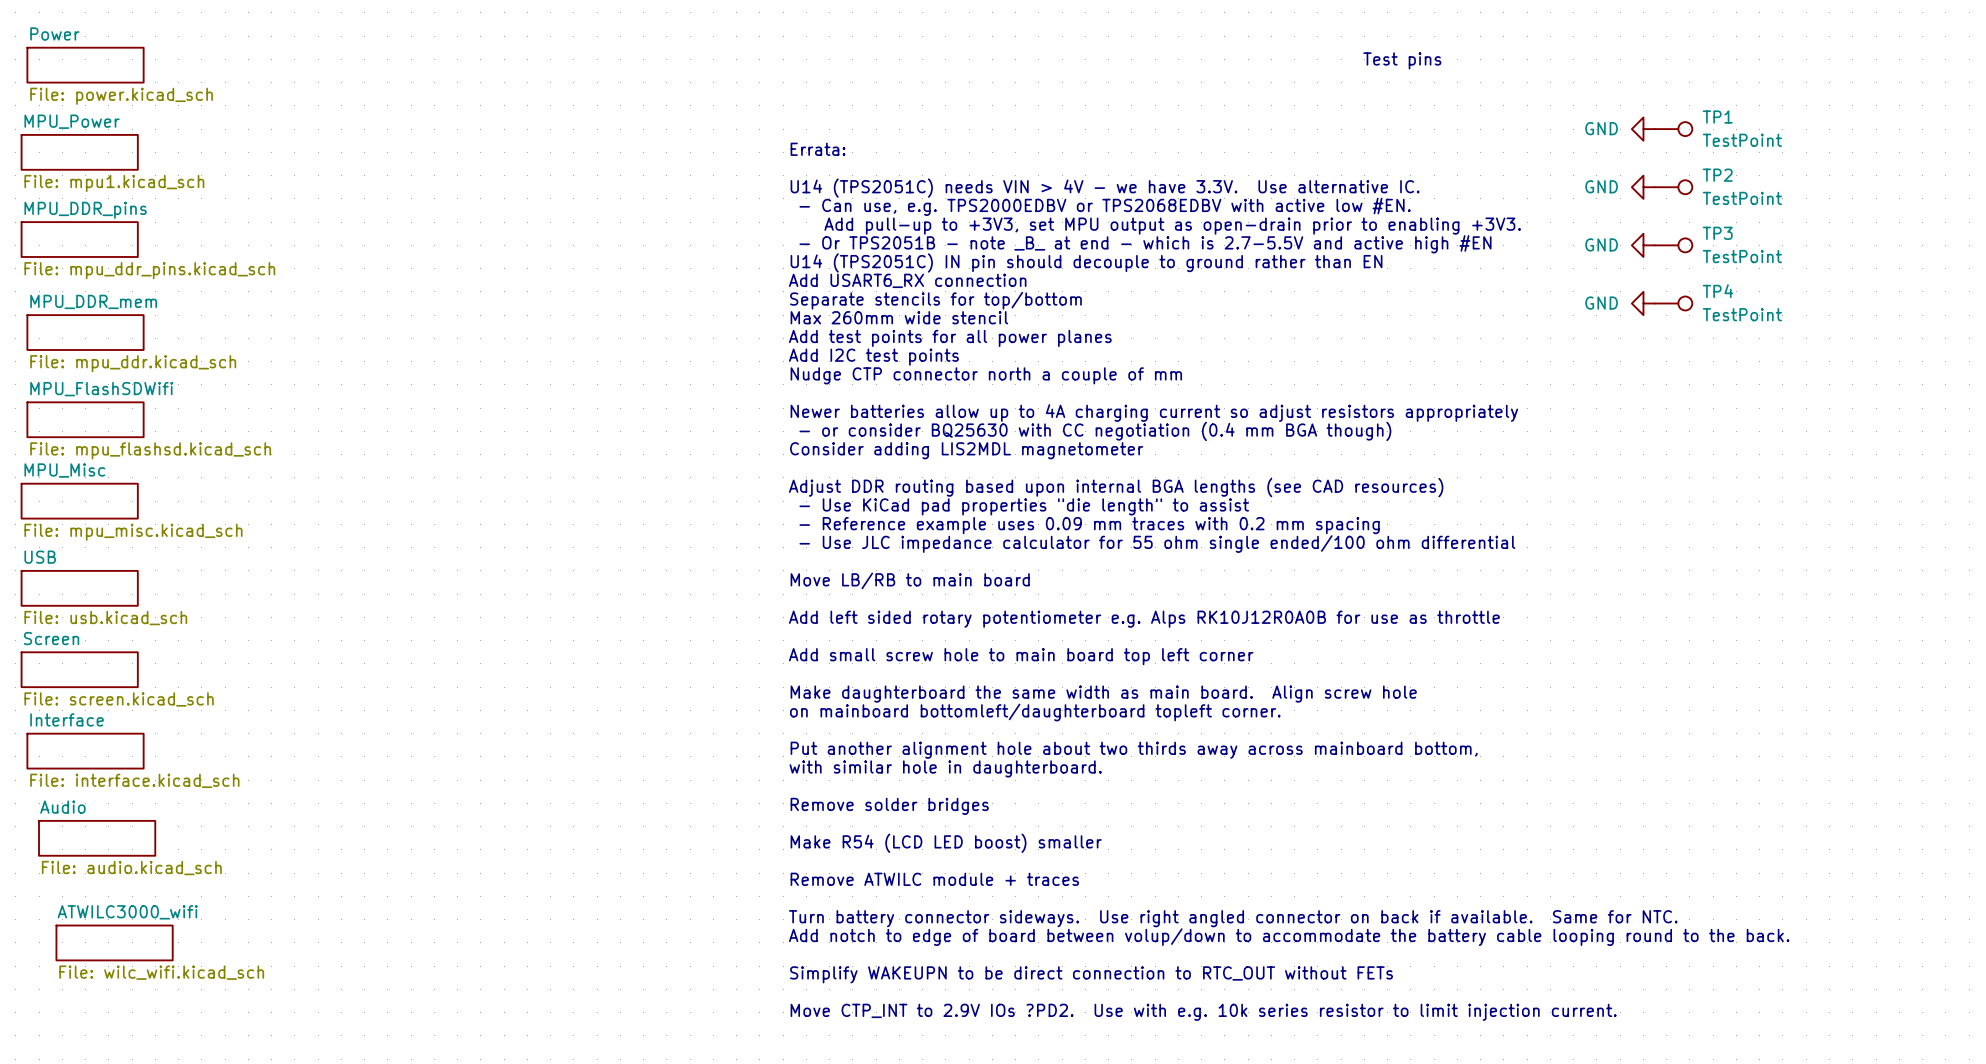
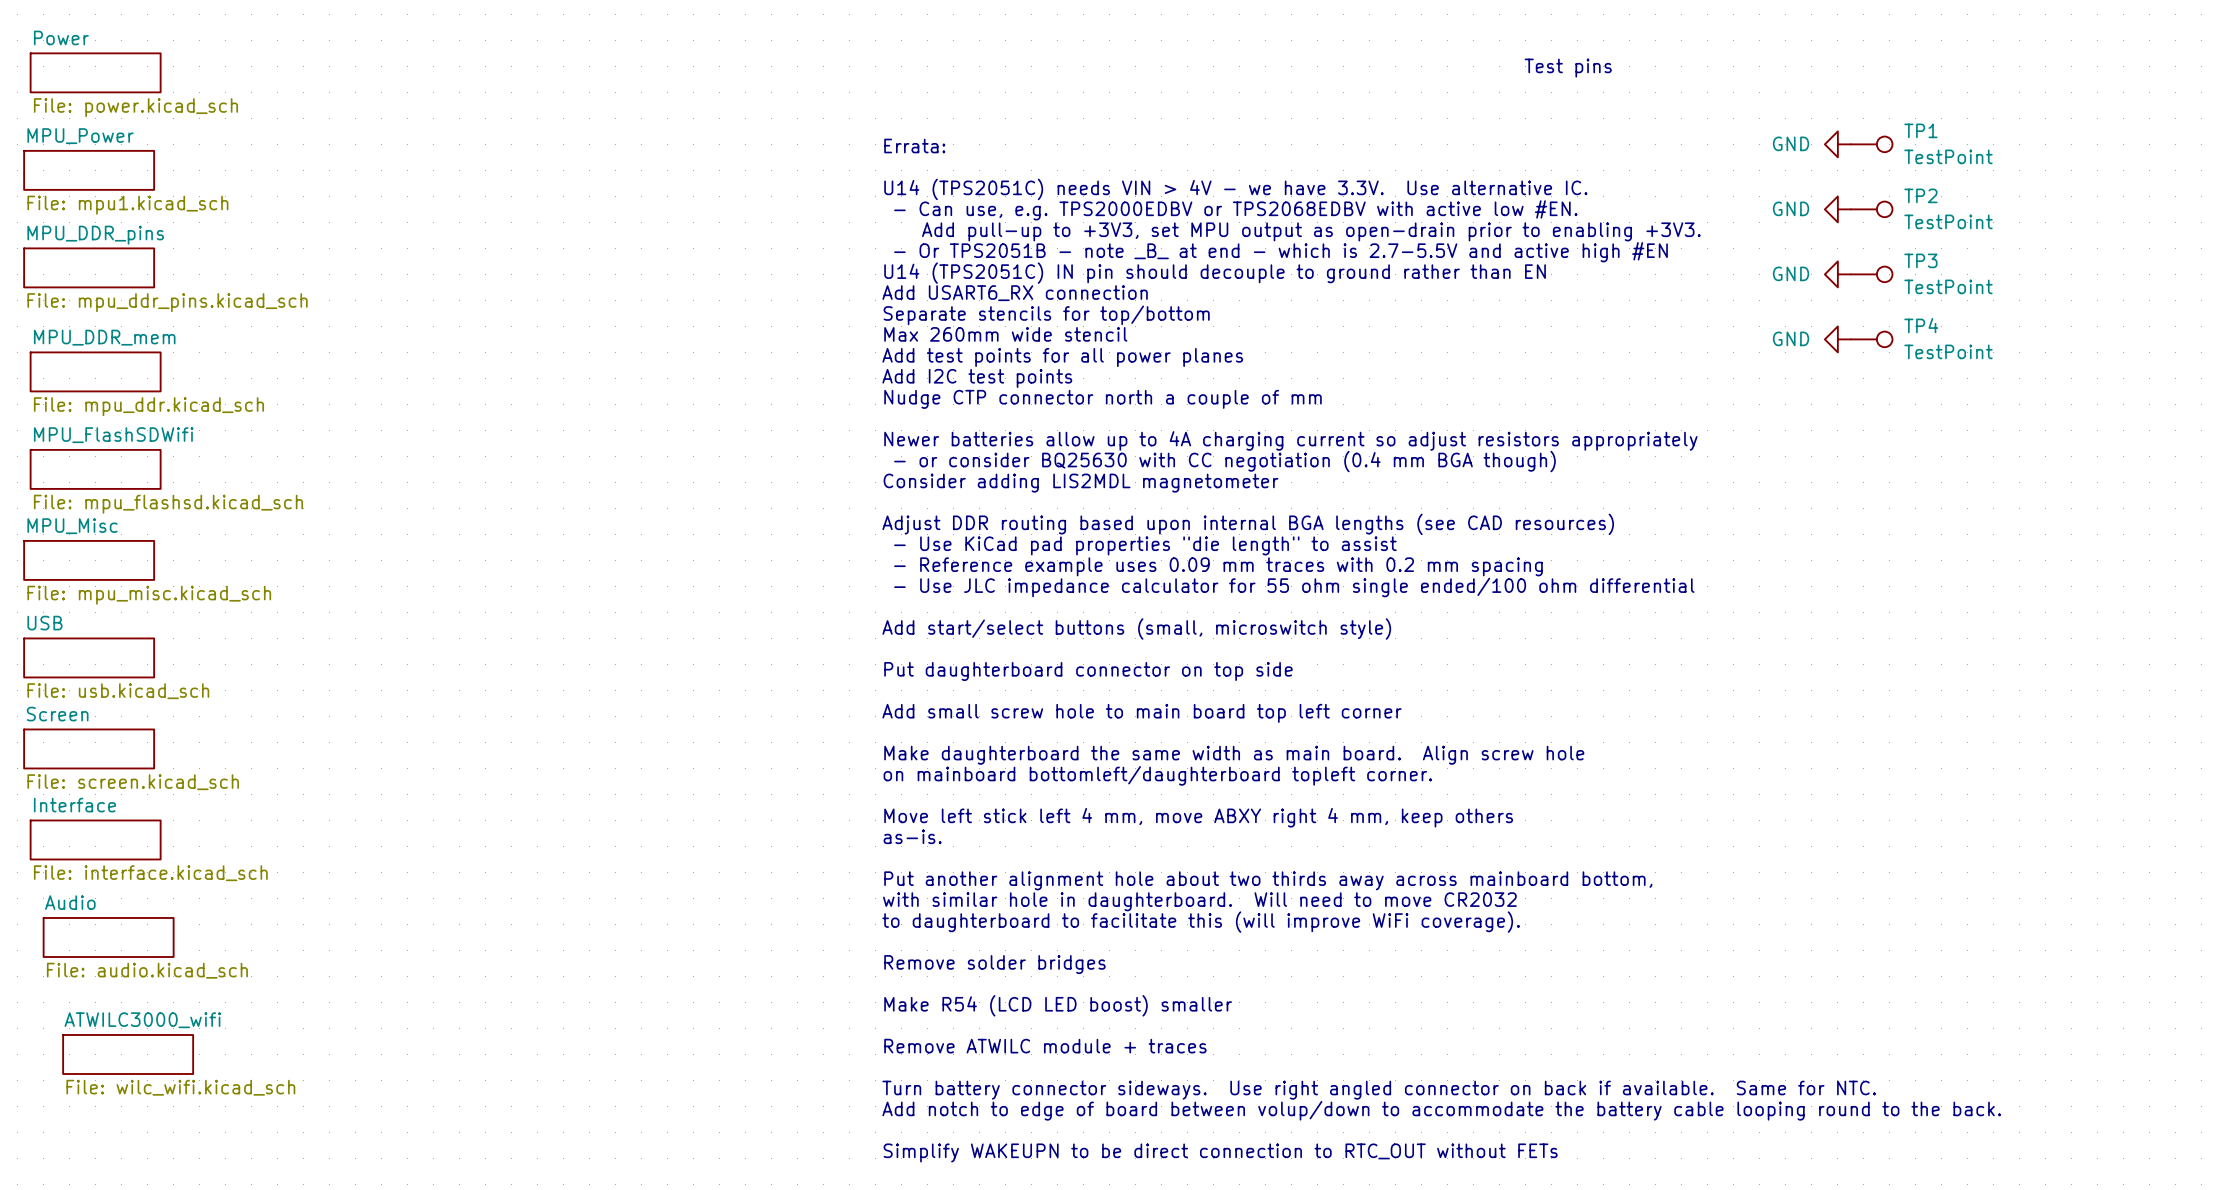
text position: Errata: (818, 149) -> Errata: (914, 146)
text: none -> U14 (TPS2051C) needs VIN > 4V - we have 3.3V. Use alternative IC. (1235, 189)
text: U14 (TPS2051C) needs VIN > 4V - we have 3.3V. Use alternative IC. (1105, 188) -> - Can use, e.g. TPS2000EDBV or TPS2068EDBV with active low #EN. (1235, 210)
text: - Can use, e.g. TPS2000EDBV or TPS2068EDBV with active low #EN. (1105, 206) -> Add pull-up to +3V3, set MPU output as open-drain prior to enabling +3V3. (1311, 231)
text: Add pull-up to +3V3, set MPU output as open-drain prior to enabling +3V3. (1172, 226) -> - Or TPS2051B - note _B_ at end - which is 2.7-5.5V and active high #EN (1281, 252)
text: - Or TPS2051B - note _B_ at end - which is 2.7-5.5V and active high #EN (1145, 244) -> U14 (TPS2051C) IN pin should decouple to ground rather than EN (1215, 273)
text: U14 (TPS2051C) IN pin should decouple to ground rather than EN (1086, 262) -> Add USART6_RX connection (1015, 293)
text: Add USART6_RX connection (907, 280) -> Separate stencils for top/bottom (1046, 315)
text: Separate stencils for top/bottom (935, 300) -> Max 260mm wide stencil (1005, 334)
text: Max 260mm wide stencil (899, 317) -> Add test points for all power planes (1062, 357)
text: Add test points for all power planes (950, 338) -> Add I2C test points (977, 378)
text: Add I2C test points (873, 357) -> Nudge CTP connector north a couple of mm (1103, 399)
text: Nudge CTP connector north a couple of mm (986, 375) -> none
text: none -> Newer batteries allow up to 4A charging current so adjust resistors appropriately (1290, 440)
text: Newer batteries allow up to 4A charging current so adjust resistors appropriately (1154, 413) -> - or consider BQ25630 with CC negotiation (0.4 mm BGA though) (1224, 461)
text: - or consider BQ25630 with CC negotiation (0.4 mm BGA though) (1095, 431) -> Consider adding LIS2MDL magnetometer (1081, 483)
text: Consider adding LIS2MDL magnetometer (966, 450) -> none
text: none -> Adjust DDR routing based upon internal BGA lengths (see CAD resources) (1248, 524)
text: Adjust DDR routing based upon internal BGA lengths (see CAD resources) (1116, 487) -> - Use KiCad pad properties "die length" to assist (1145, 545)
text: - Use KiCad pad properties "die length" to assist (1024, 506) -> - Reference example uses 0.09 mm traces with 0.2 mm spacing (1218, 566)
text: - Reference example uses 0.09 mm traces with 0.2 mm spacing (1089, 525) -> - Use JLC impedance calculator for 55 ohm single ended/100 ohm differential (1294, 587)
text: - Use JLC impedance calculator for 55 ohm single ended/100 ohm differential (1157, 544) -> none
text: none -> Add start/select buttons (small, microswitch style) (1136, 629)
text: Move LB/RB to main board (910, 580) -> none
text: none -> Put daughterboard connector on top side (1088, 671)
text: Add left sided rotary potentiometer e.g. Alps RK10J12R0A0B for use as throttle (1144, 619) -> none
text position: Add small screw hole to main board top left corner (1021, 656) -> Add small screw hole to main board top left corner (1142, 713)
text: none -> Make daughterboard the same width as main board. Align screw hole (1234, 755)
text: Make daughterboard the same width as main board. Align screw hole (1103, 694) -> on mainboard bottomleft/daughterboard topleft corner. (1157, 775)
text: on mainboard bottomleft/daughterboard topleft corner. (1035, 712) -> none
text: none -> Move left stick left 4 mm, move ABXY right 4 mm, keep others (1198, 817)
text: Put another alignment hole about two thirds away across mainboard bottom, (1134, 750) -> as-is. (912, 836)
text: with similar hole in daughterboard. (945, 768) -> none
text: none -> Put another alignment hole about two thirds away across mainboard bottom, (1268, 880)
text: Remove solder bridges (889, 806) -> with similar hole in daughterboard. Will need to move CR2032 (1199, 901)
text: none -> to daughterboard to facilitate this (will improve WiFi coverage). (1201, 922)
text position: Make R54 (LCD LED boost) smaller (946, 843) -> Make R54 (LCD LED boost) smaller (1058, 1005)
text: none -> Remove solder bridges (994, 964)
text: Remove ATWILC module + traces (934, 879) -> none
text: Turn battery connector sideways. Use right angled connector on back if available. Same for NTC. (1233, 918) -> none
text: Add notch to edge of board between volup/down to accommodate the battery cable looping round to the back. (1289, 937) -> Remove ATWILC module + traces (1045, 1046)
text: Simplify WAKEUPN to be direct connection to RTC_OUT without FETs (1091, 974) -> Turn battery connector sideways. Use right angled connector on back if available. Same for NTC. (1379, 1090)
text: none -> Add notch to edge of board between volup/down to accommodate the battery cable looping round to the back. (1441, 1110)
text: Move CTP_INT to 2.9V IOs ?PD2. Use with e.g. 10k series resistor to limit injection current. (1203, 1012) -> none
text: none -> Simplify WAKEUPN to be direct connection to RTC_OUT without FETs (1220, 1152)

